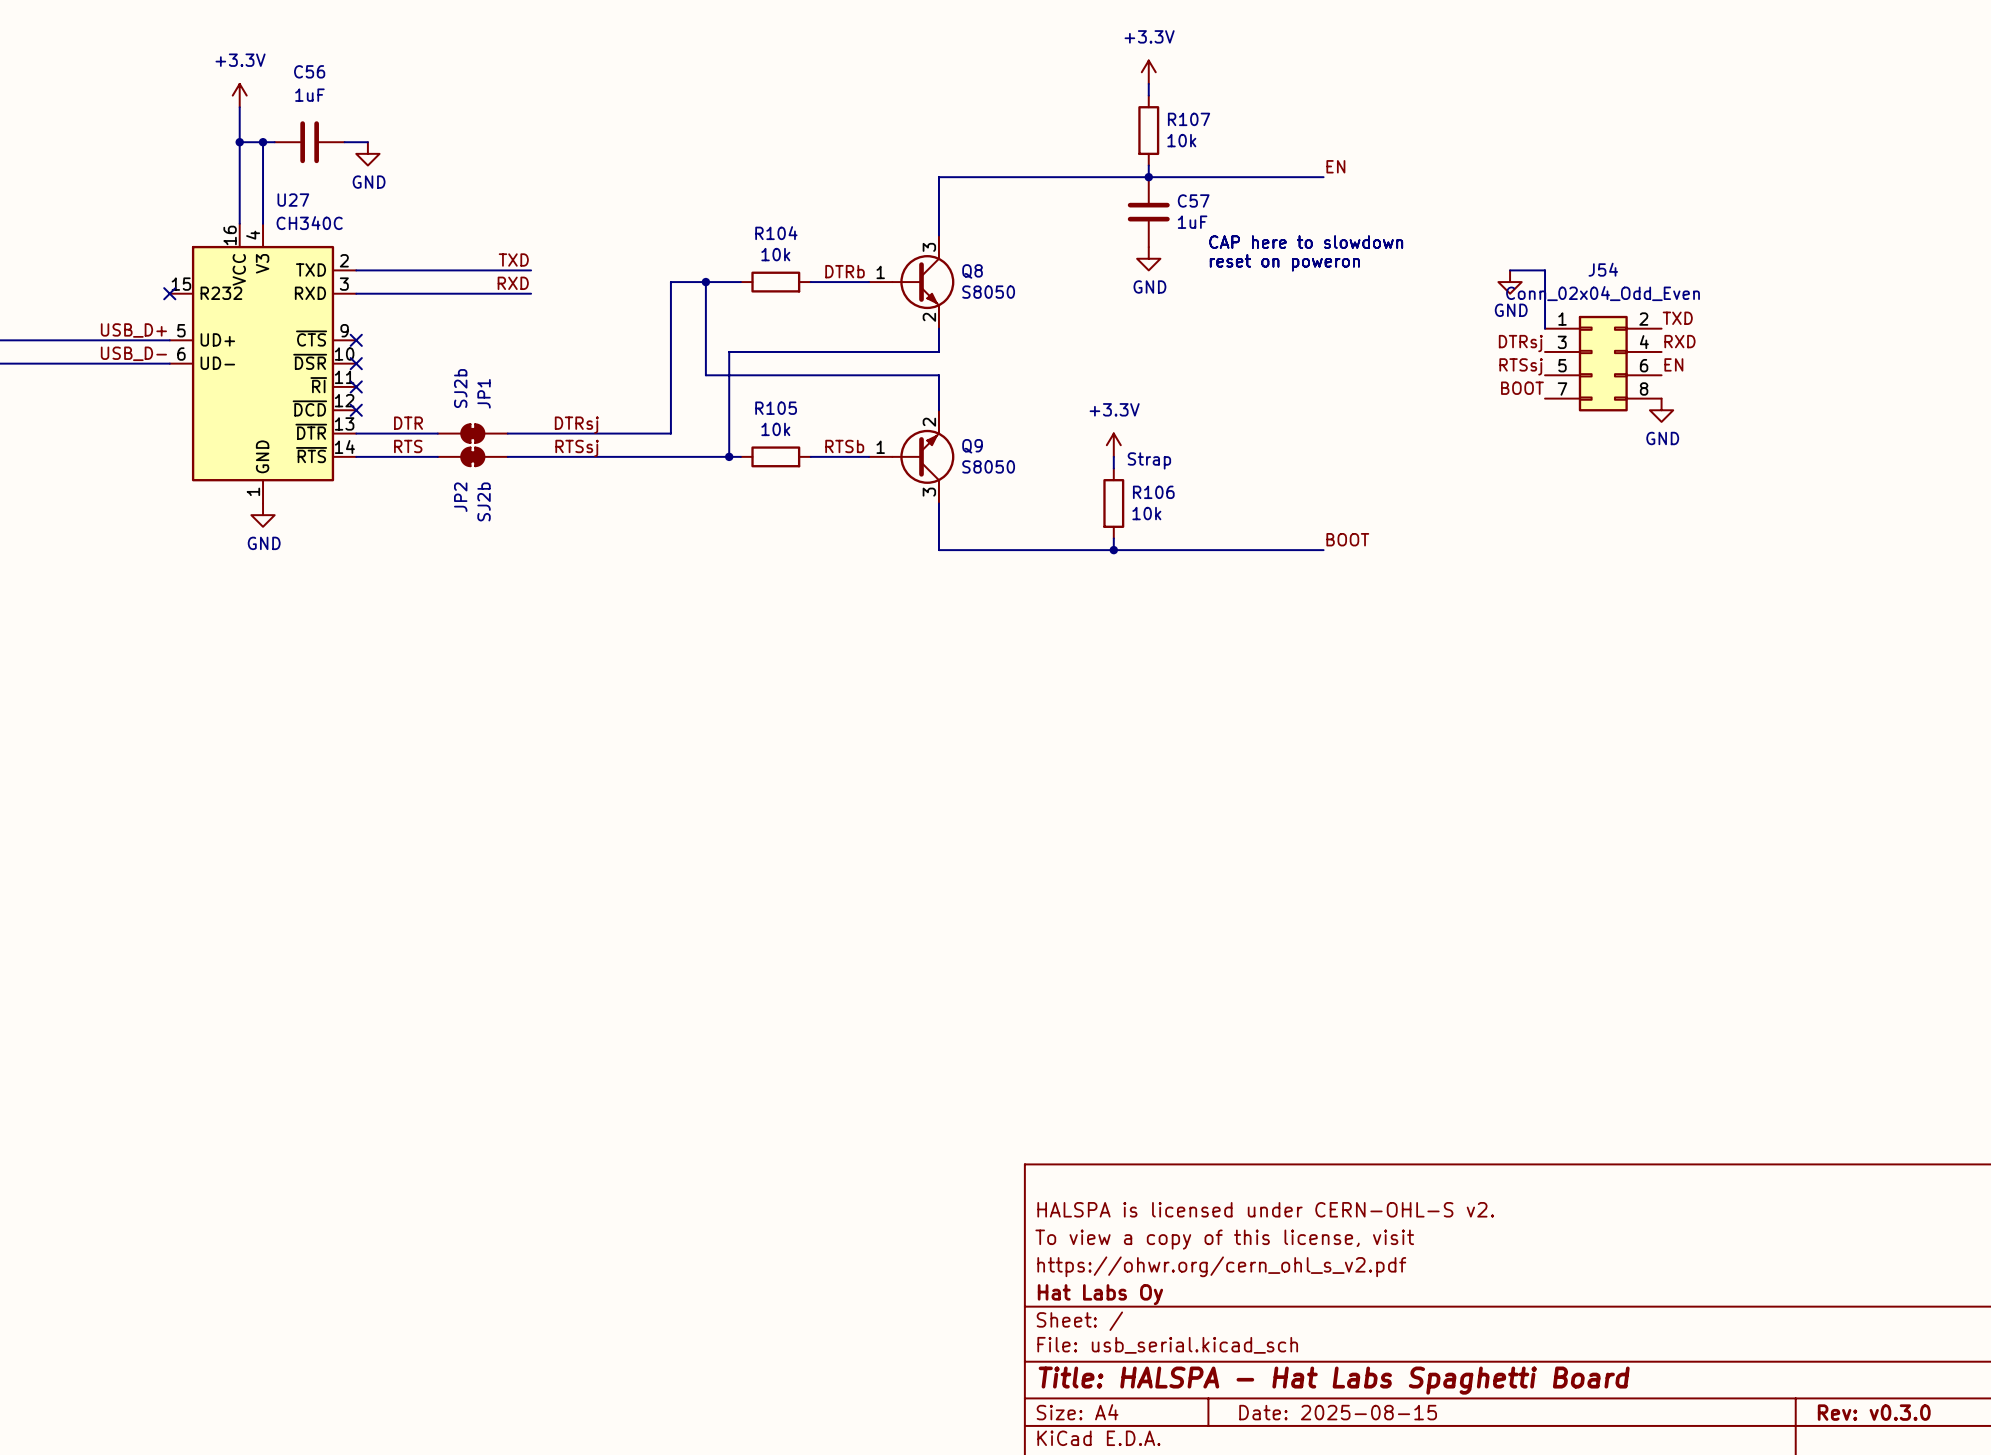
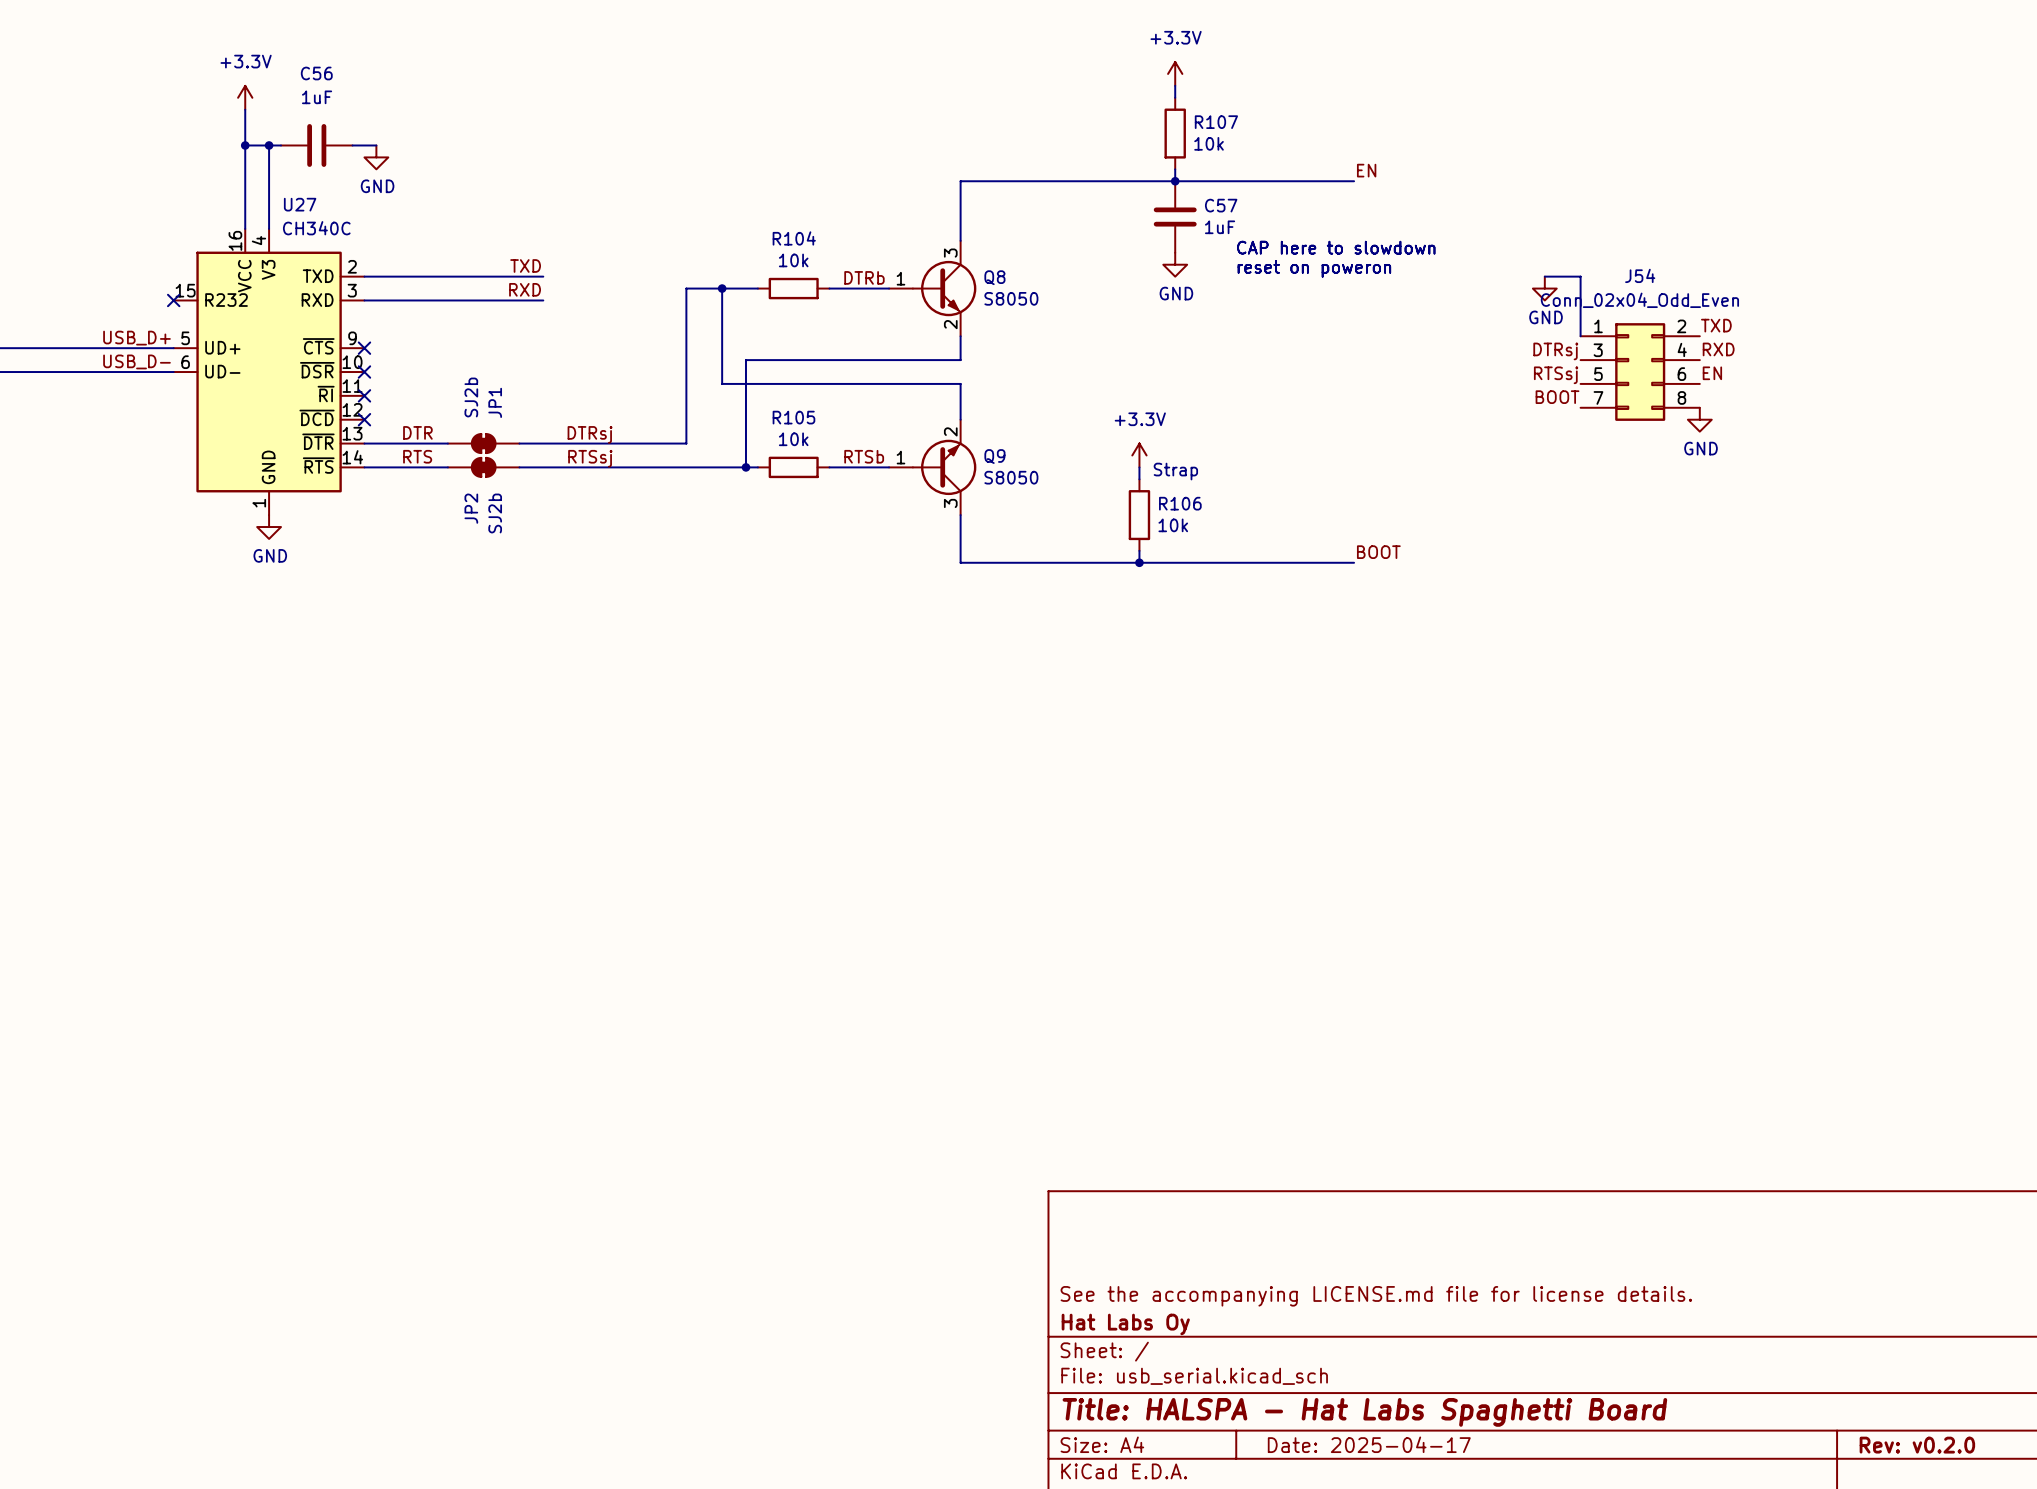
title block: HALSPA is licensed under CERN-OHL-S v2. (1265, 1209) -> none
title block: To view a copy of this license, visit (1224, 1239) -> none
title block: https://ohwr.org/cern_ohl_s_v2.pdf (1221, 1266) -> See the accompanying LICENSE.md file for license details. (1376, 1296)
title block: Date: 2025-08-15 (1338, 1412) -> Date: 2025-04-17 (1369, 1444)
title block: Rev: v0.3.0 (1874, 1412) -> Rev: v0.2.0 (1917, 1445)

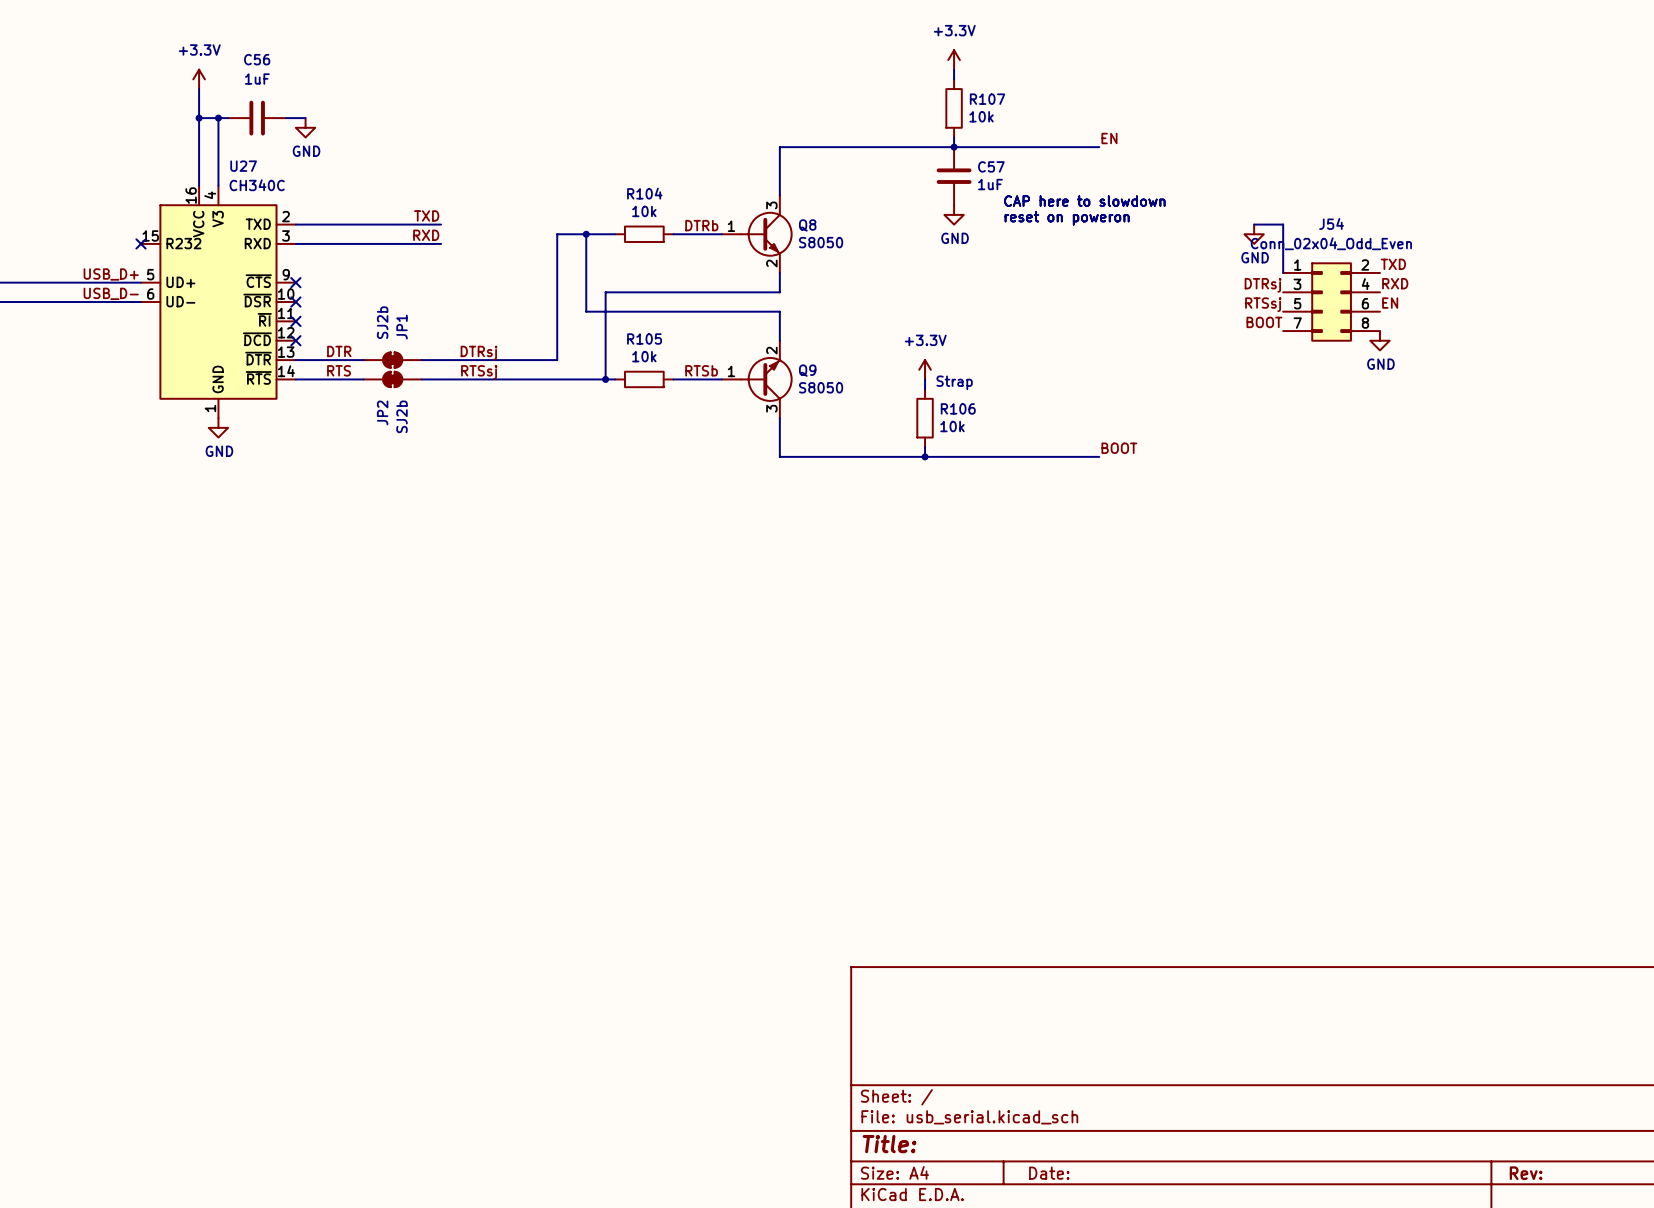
title block: See the accompanying LICENSE.md file for license details. (1376, 1296) -> none
title block: Hat Labs Oy (1125, 1324) -> none
title block: Title: HALSPA - Hat Labs Spaghetti Board (1364, 1412) -> Title: (889, 1144)
title block: Date: 2025-04-17 (1369, 1444) -> Date: (1049, 1173)
title block: Rev: v0.2.0 (1917, 1445) -> Rev: (1526, 1173)

